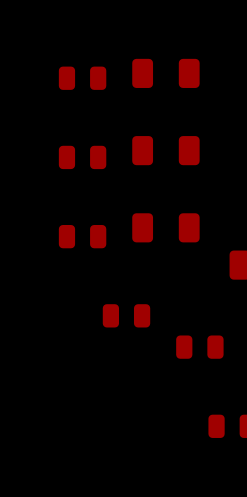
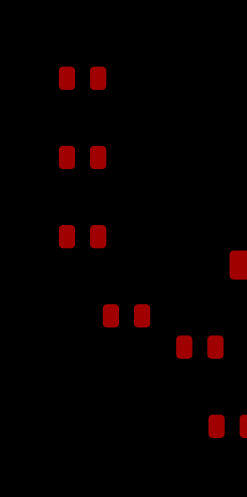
part: (165, 73) -> none
part: (165, 150) -> none
part: (165, 227) -> none

